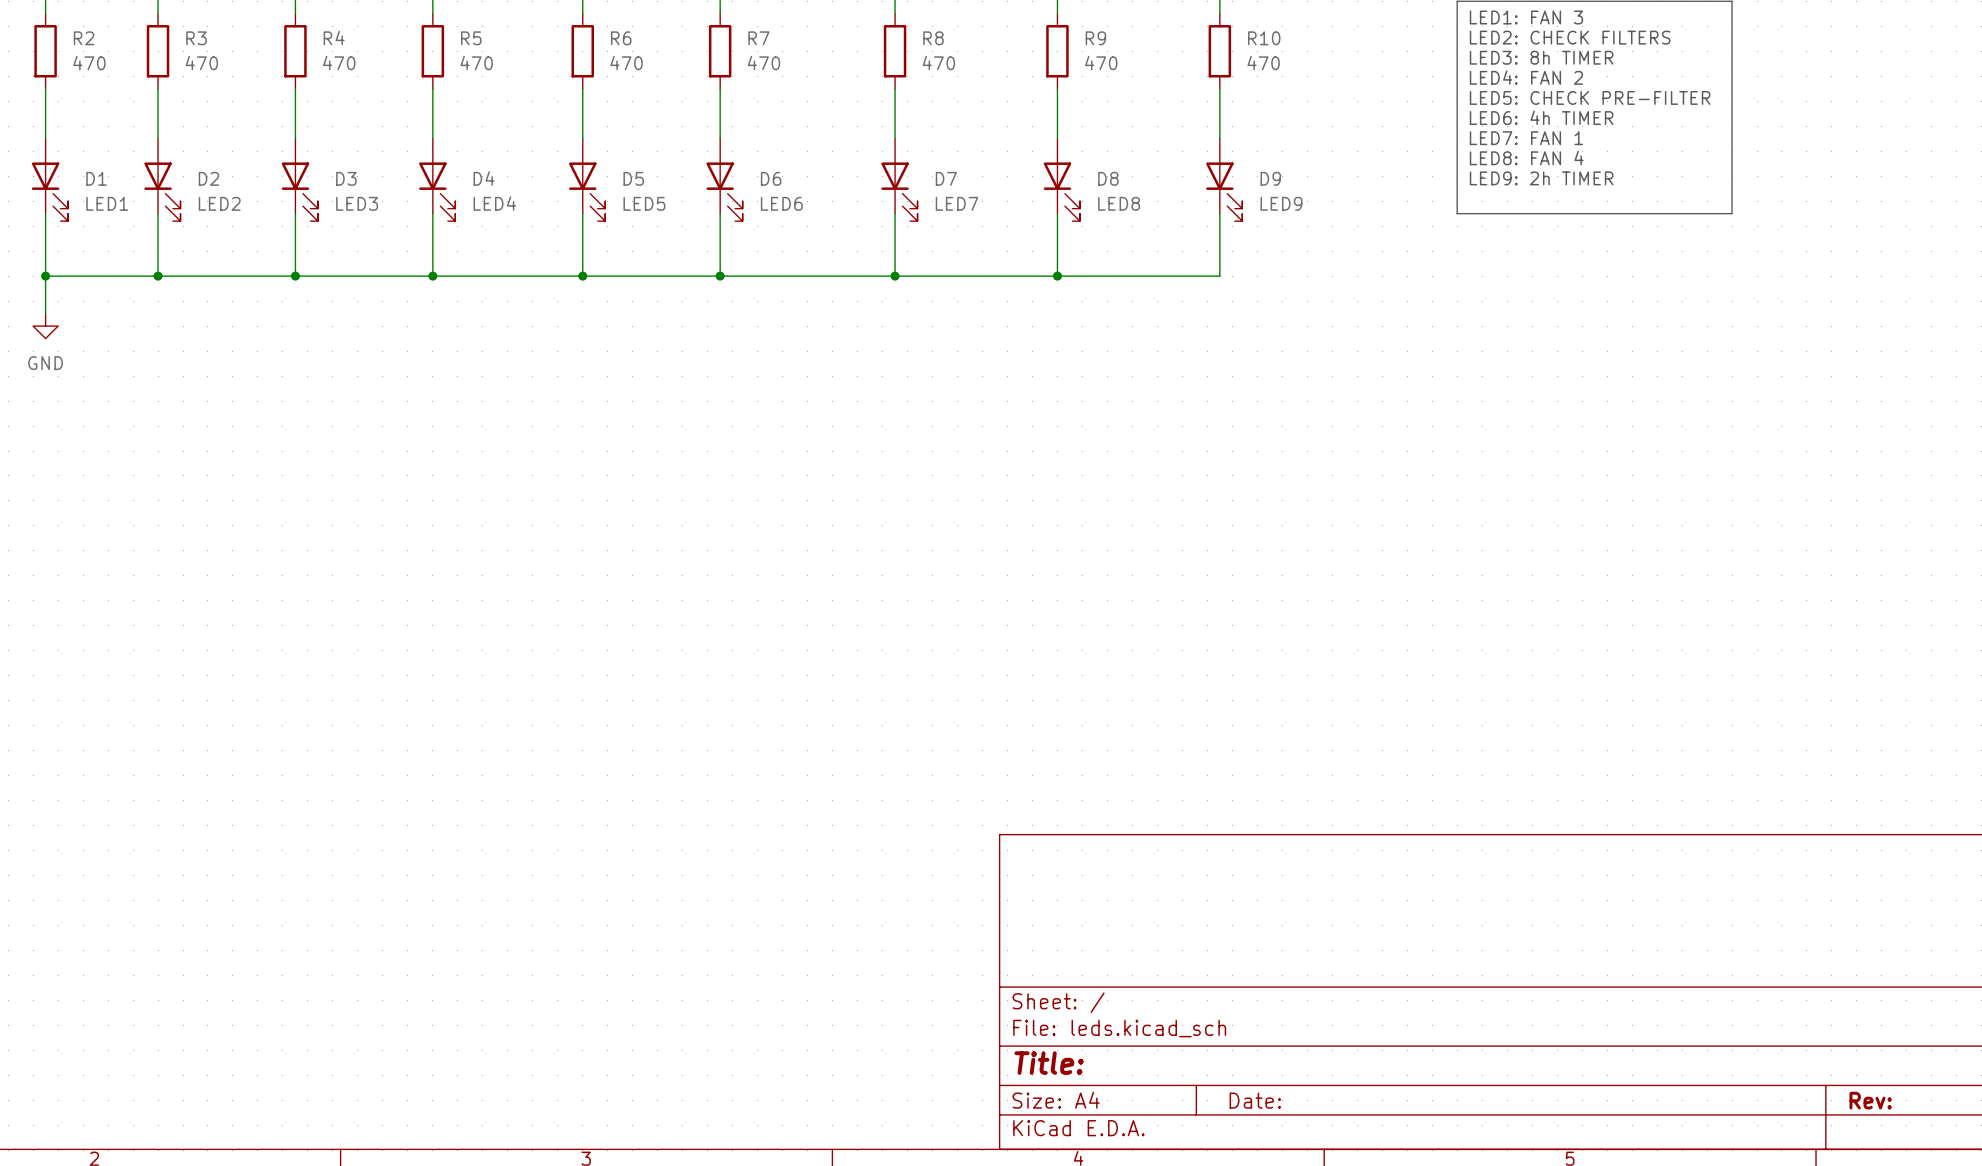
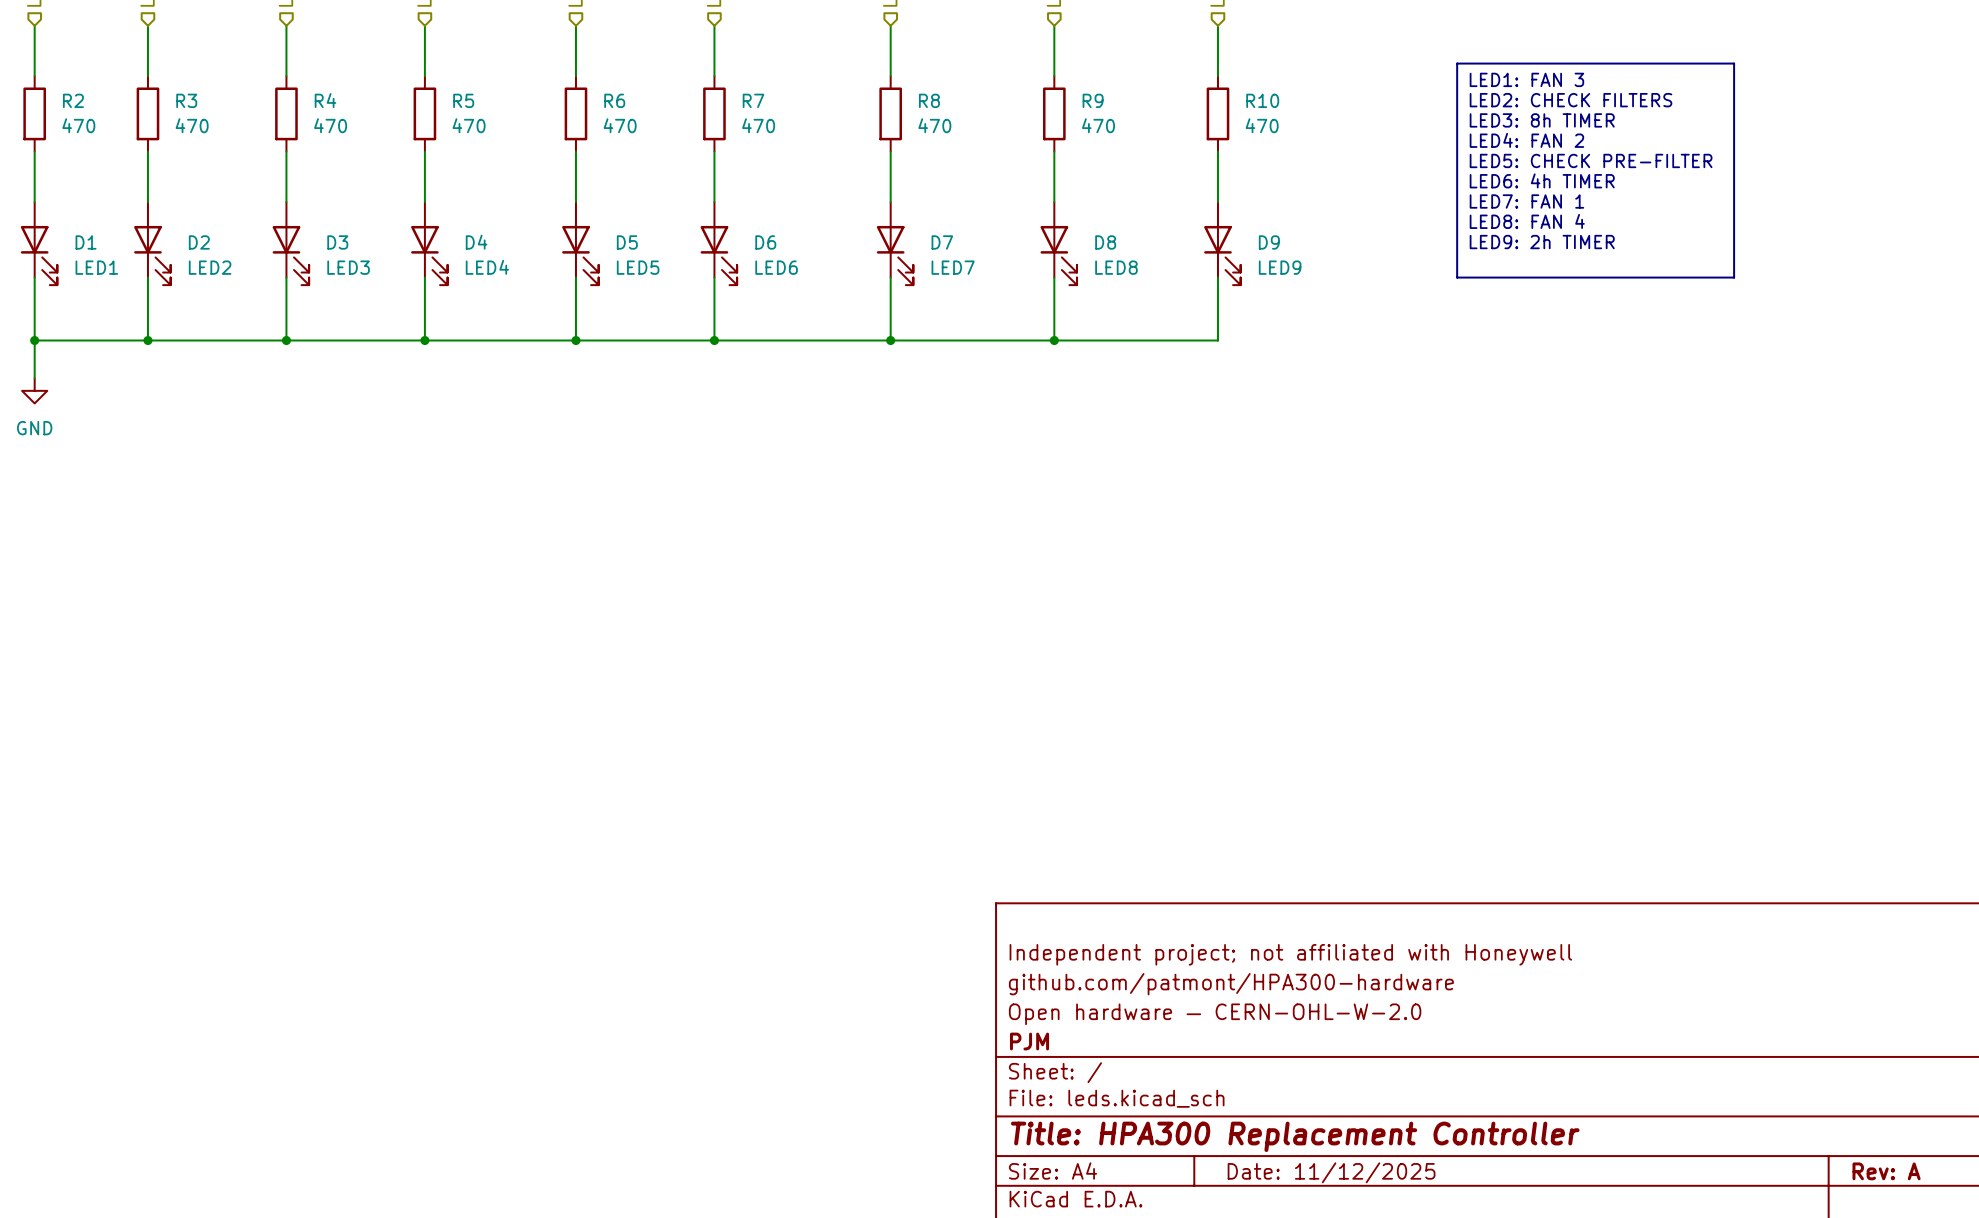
title block: none -> Independent project; not affiliated with Honeywell (1290, 954)
title block: none -> github.com/patmont/HPA300-hardware (1231, 984)
title block: none -> Open hardware — CERN-OHL-W-2.0 (1215, 1014)
title block: none -> PJM (1029, 1041)
title block: Title: (1049, 1063) -> Title: HPA300 Replacement Controller (1295, 1136)
title block: Date: (1255, 1100) -> Date: 11/12/2025 (1331, 1172)
title block: Rev: (1870, 1100) -> Rev: A (1886, 1171)

